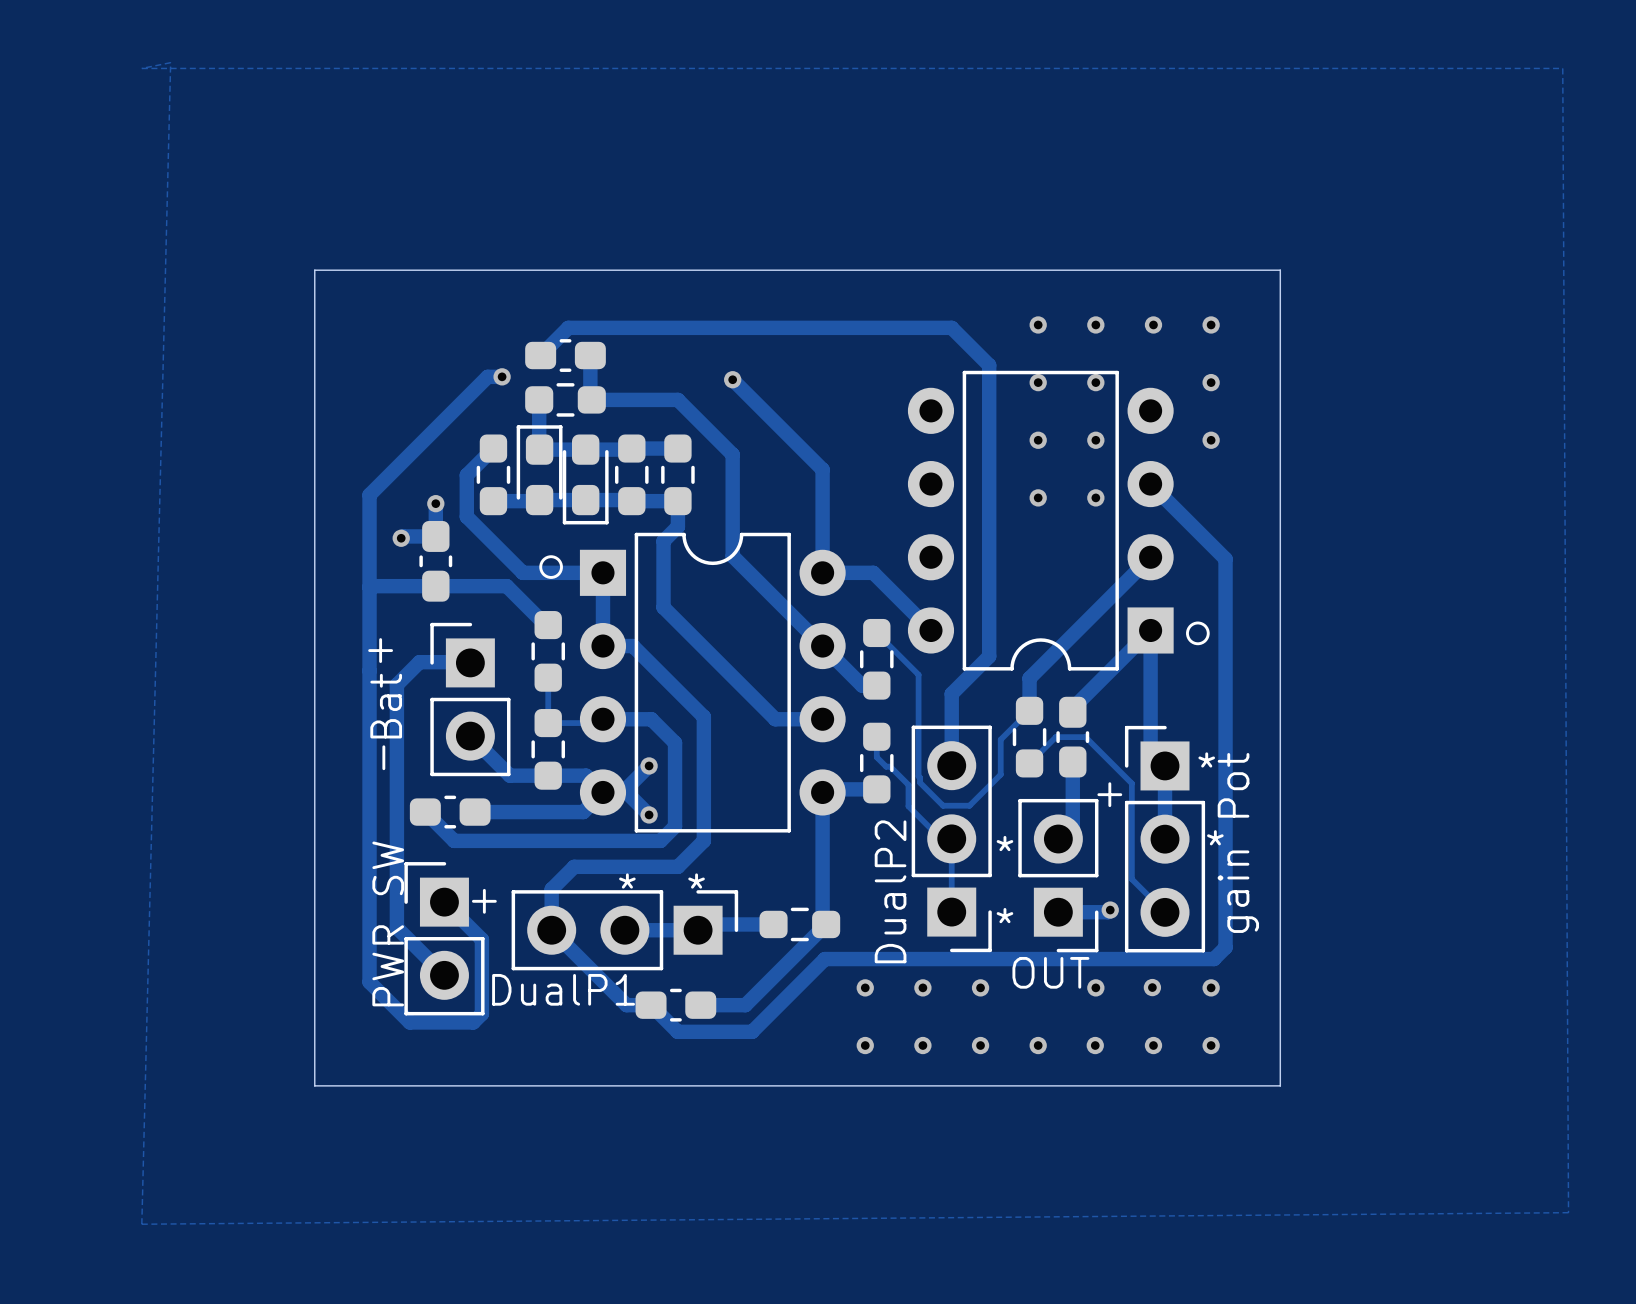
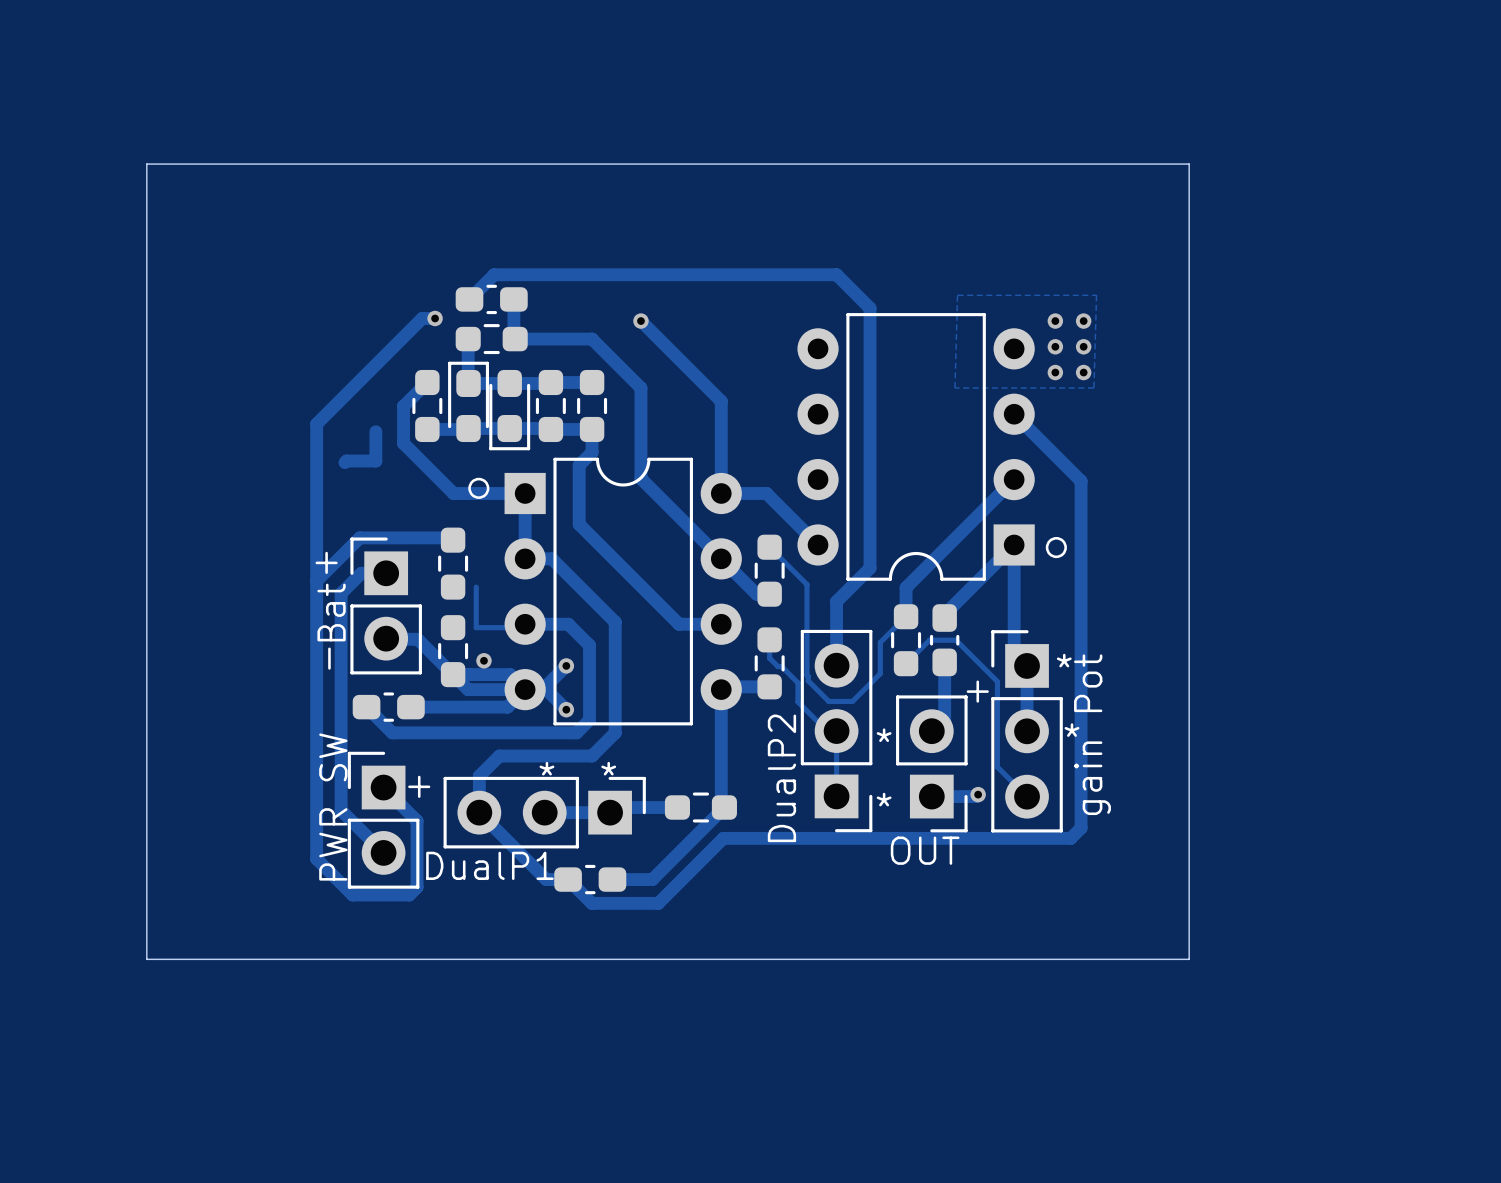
zone outline: (170, 62) (141, 1224) (1568, 1212) (1562, 68) (141, 68) (170, 62) -> none
board edge: (314, 270) (1280, 270) (1280, 1085) (314, 1085) (314, 270) -> (146, 164) (146, 959) (1189, 959) (1189, 164) (146, 164)
via: (1038, 324) -> none
via: (1095, 324) -> none
via: (1153, 324) -> none
via: (1211, 324) -> none
zone outline: none -> (957, 295) (954, 387) (1093, 387) (1096, 295) (957, 295)
via: none -> (1055, 321)
via: none -> (1083, 321)
via: (1038, 382) -> none
via: (1095, 382) -> none
via: (1211, 382) -> none
via: none -> (1055, 346)
via: none -> (1083, 346)
via: none -> (1055, 372)
via: none -> (1083, 372)
via: (1038, 440) -> none
via: (1095, 440) -> none
via: (1211, 440) -> none
via: (1038, 497) -> none
via: (1095, 497) -> none
via: (435, 503) -> none
via: (401, 538) -> none
part: (435, 561) -> none
track: (369, 587) (506, 586) (545, 625) (548, 625) -> none
track: none -> (453, 540) (450, 537) (359, 537) (316, 581)
part position: (548, 651) -> (453, 563)
part position: (470, 699) -> (386, 605)
track: none -> (386, 639) (417, 639) (468, 689) (525, 689)
track: (470, 736) (509, 775) (522, 775) -> none
part position: (548, 749) -> (453, 651)
via: none -> (483, 660)
via: (865, 987) -> none
via: (922, 987) -> none
via: (980, 987) -> none
via: (1095, 987) -> none
via: (1152, 987) -> none
via: (1211, 987) -> none
via: (865, 1045) -> none
via: (922, 1045) -> none
via: (980, 1045) -> none
via: (1038, 1045) -> none
via: (1095, 1045) -> none
via: (1153, 1045) -> none
via: (1211, 1045) -> none

